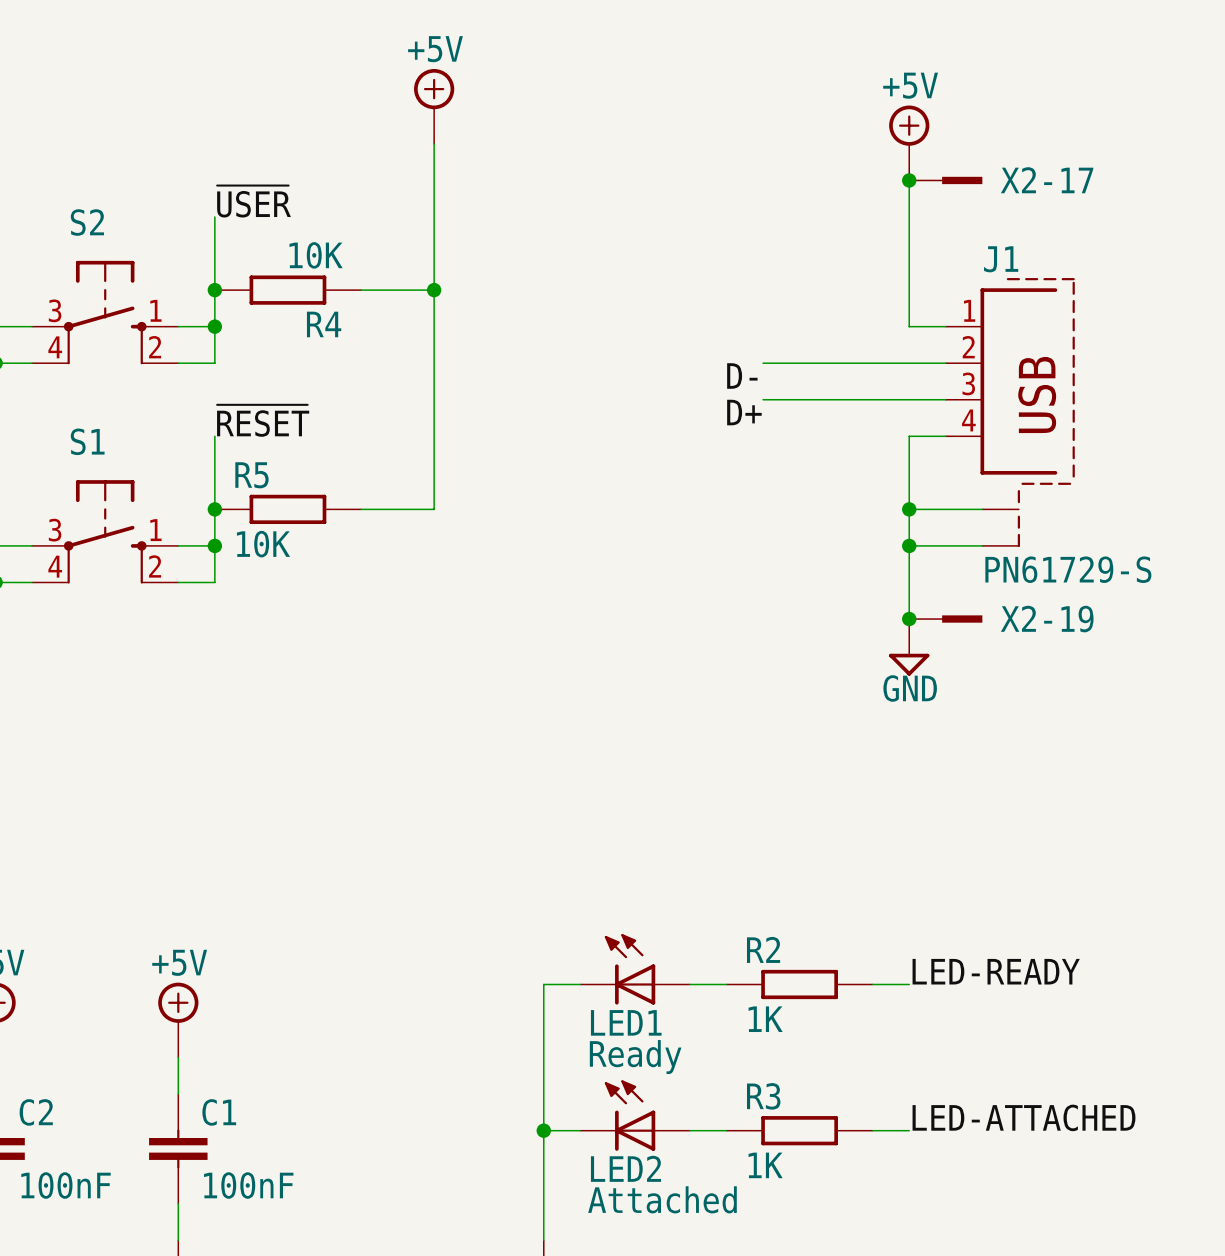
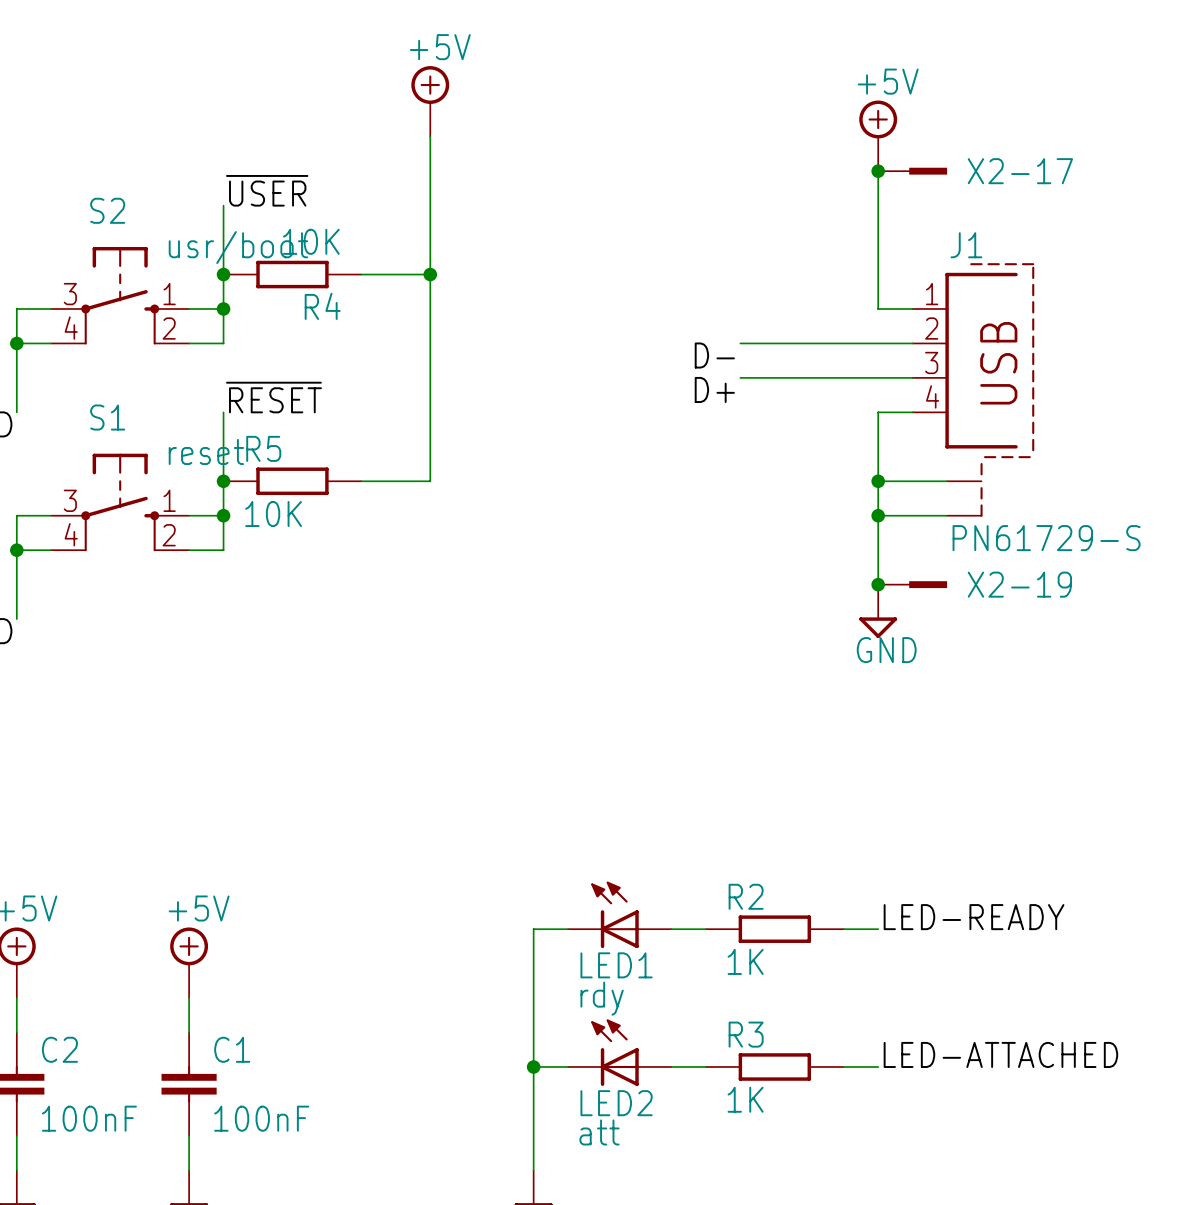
S2 value: none -> usr/boot (238, 247)
S1 value: none -> reset (206, 451)
LED1 value: Ready (635, 1057) -> rdy (602, 998)
LED2 value: Attached (662, 1199) -> att (599, 1132)

